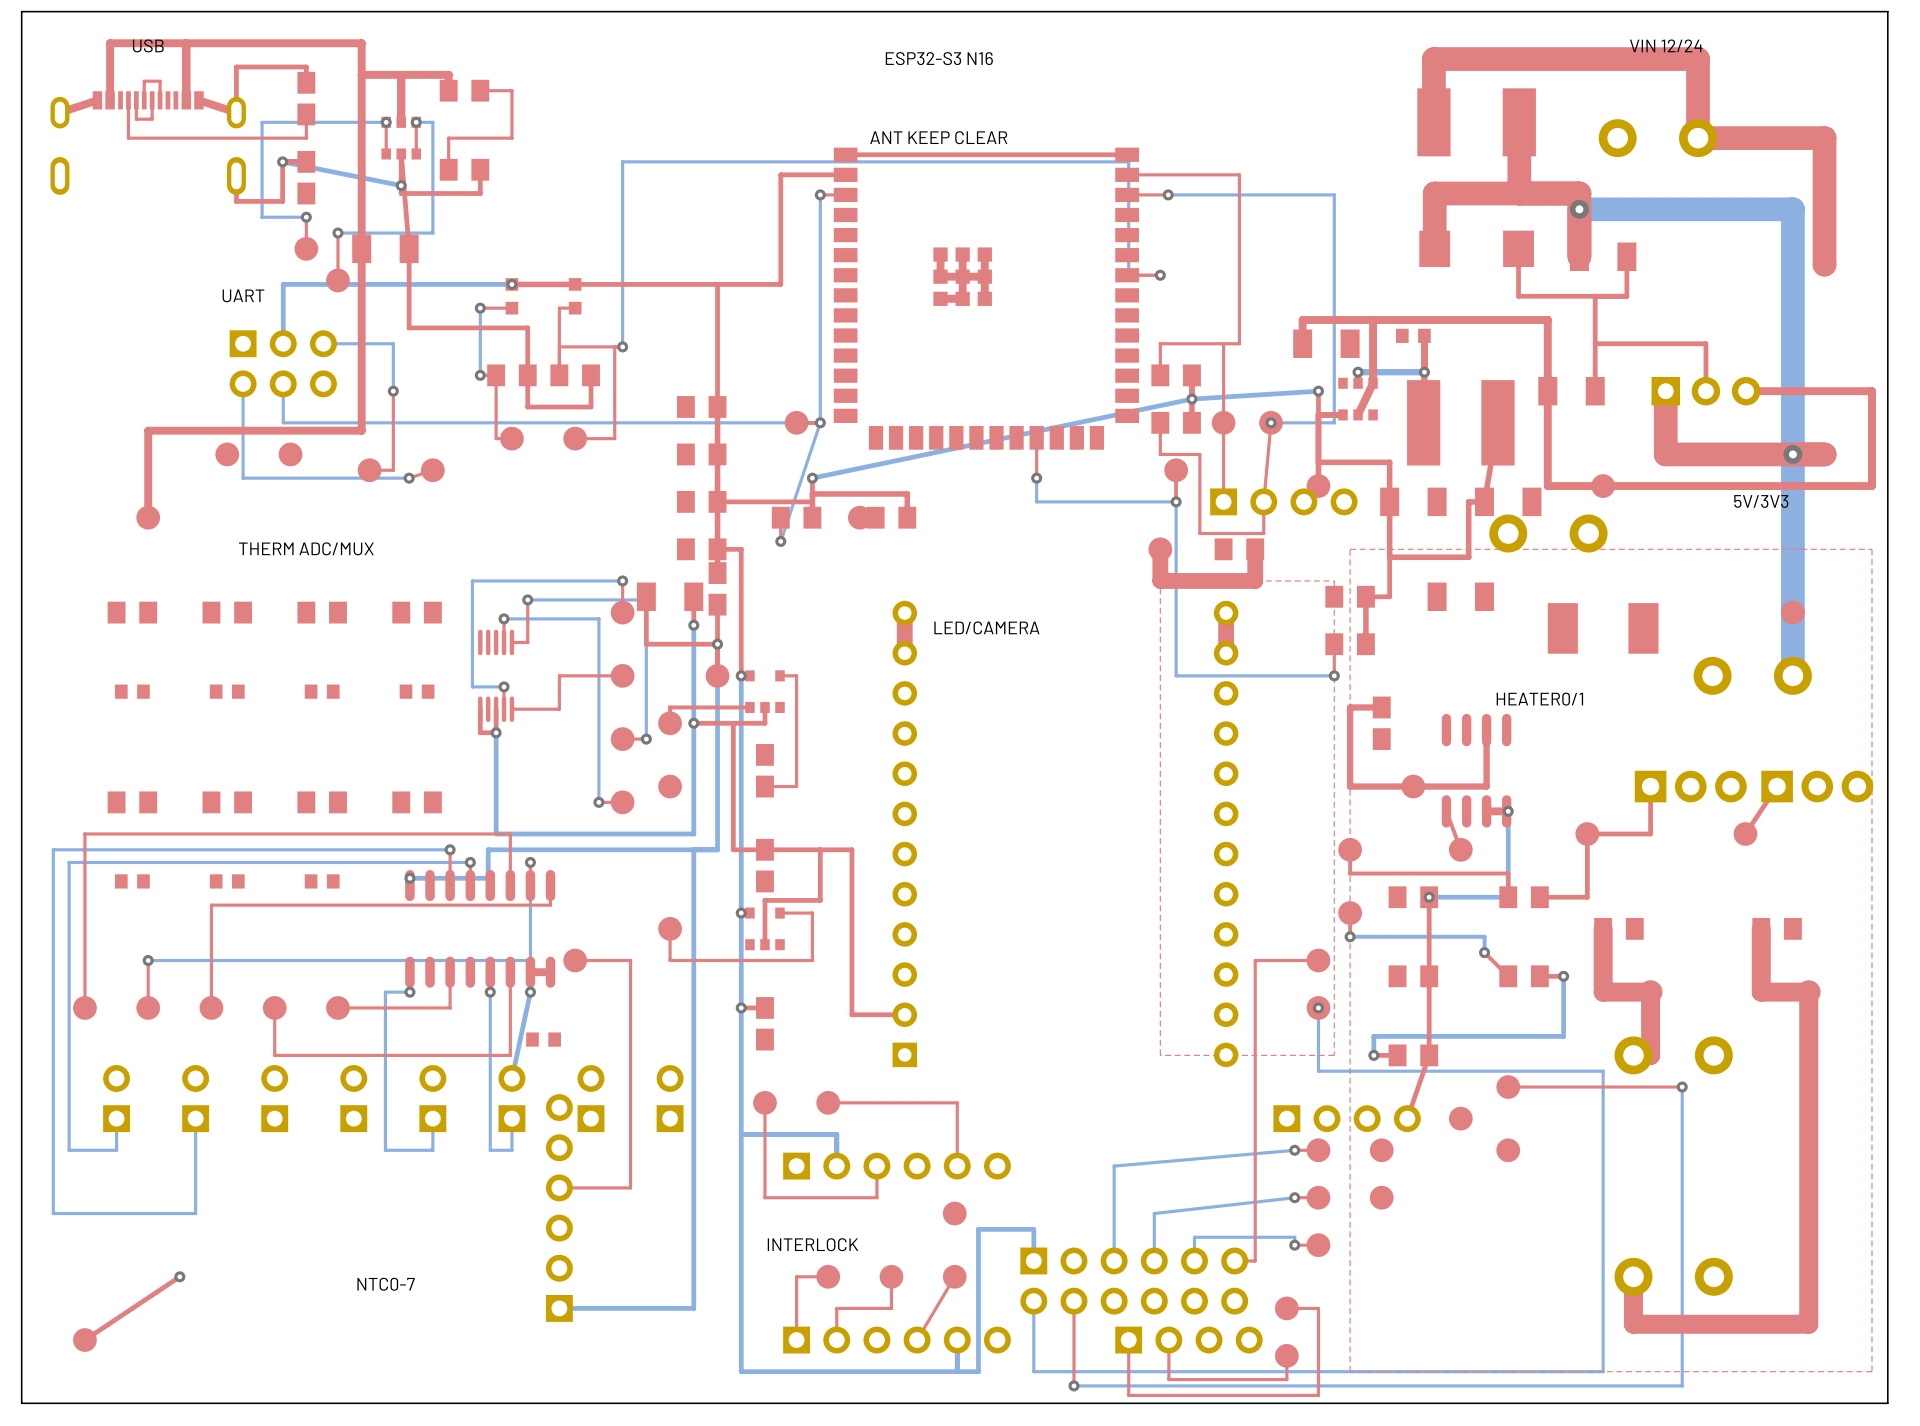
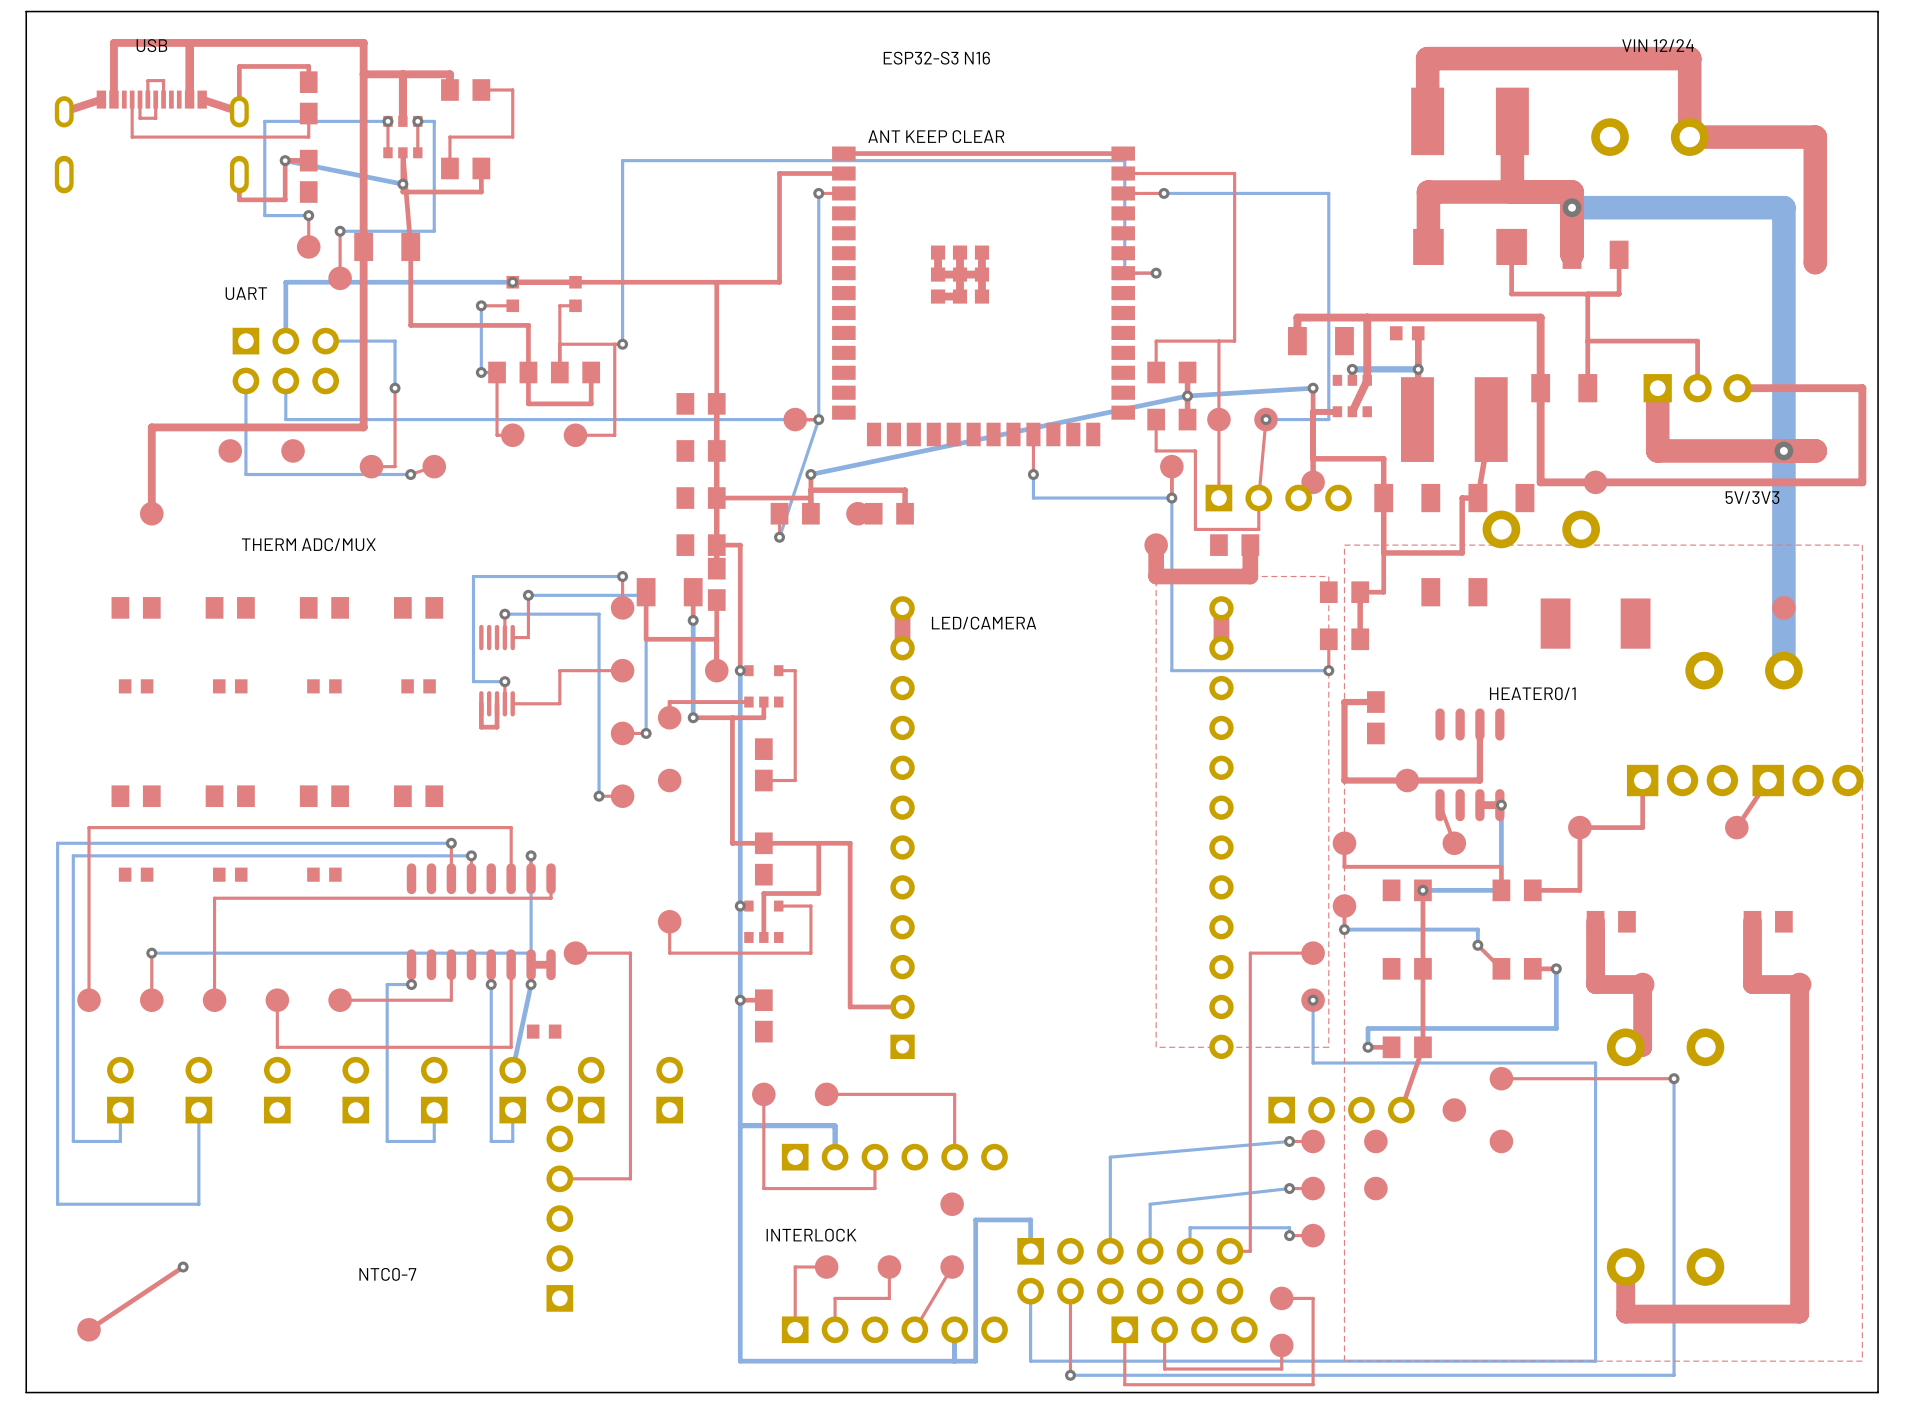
bottom track: (717, 644) (717, 849) (488, 849) (488, 878) (409, 878) -> none
via: (717, 644) -> none
bottom track: (693, 723) (693, 833) (496, 833) (496, 732) -> none
via: (496, 732) -> none
bottom track: (693, 849) (693, 1308) (559, 1308) -> none
via: (409, 878) -> none

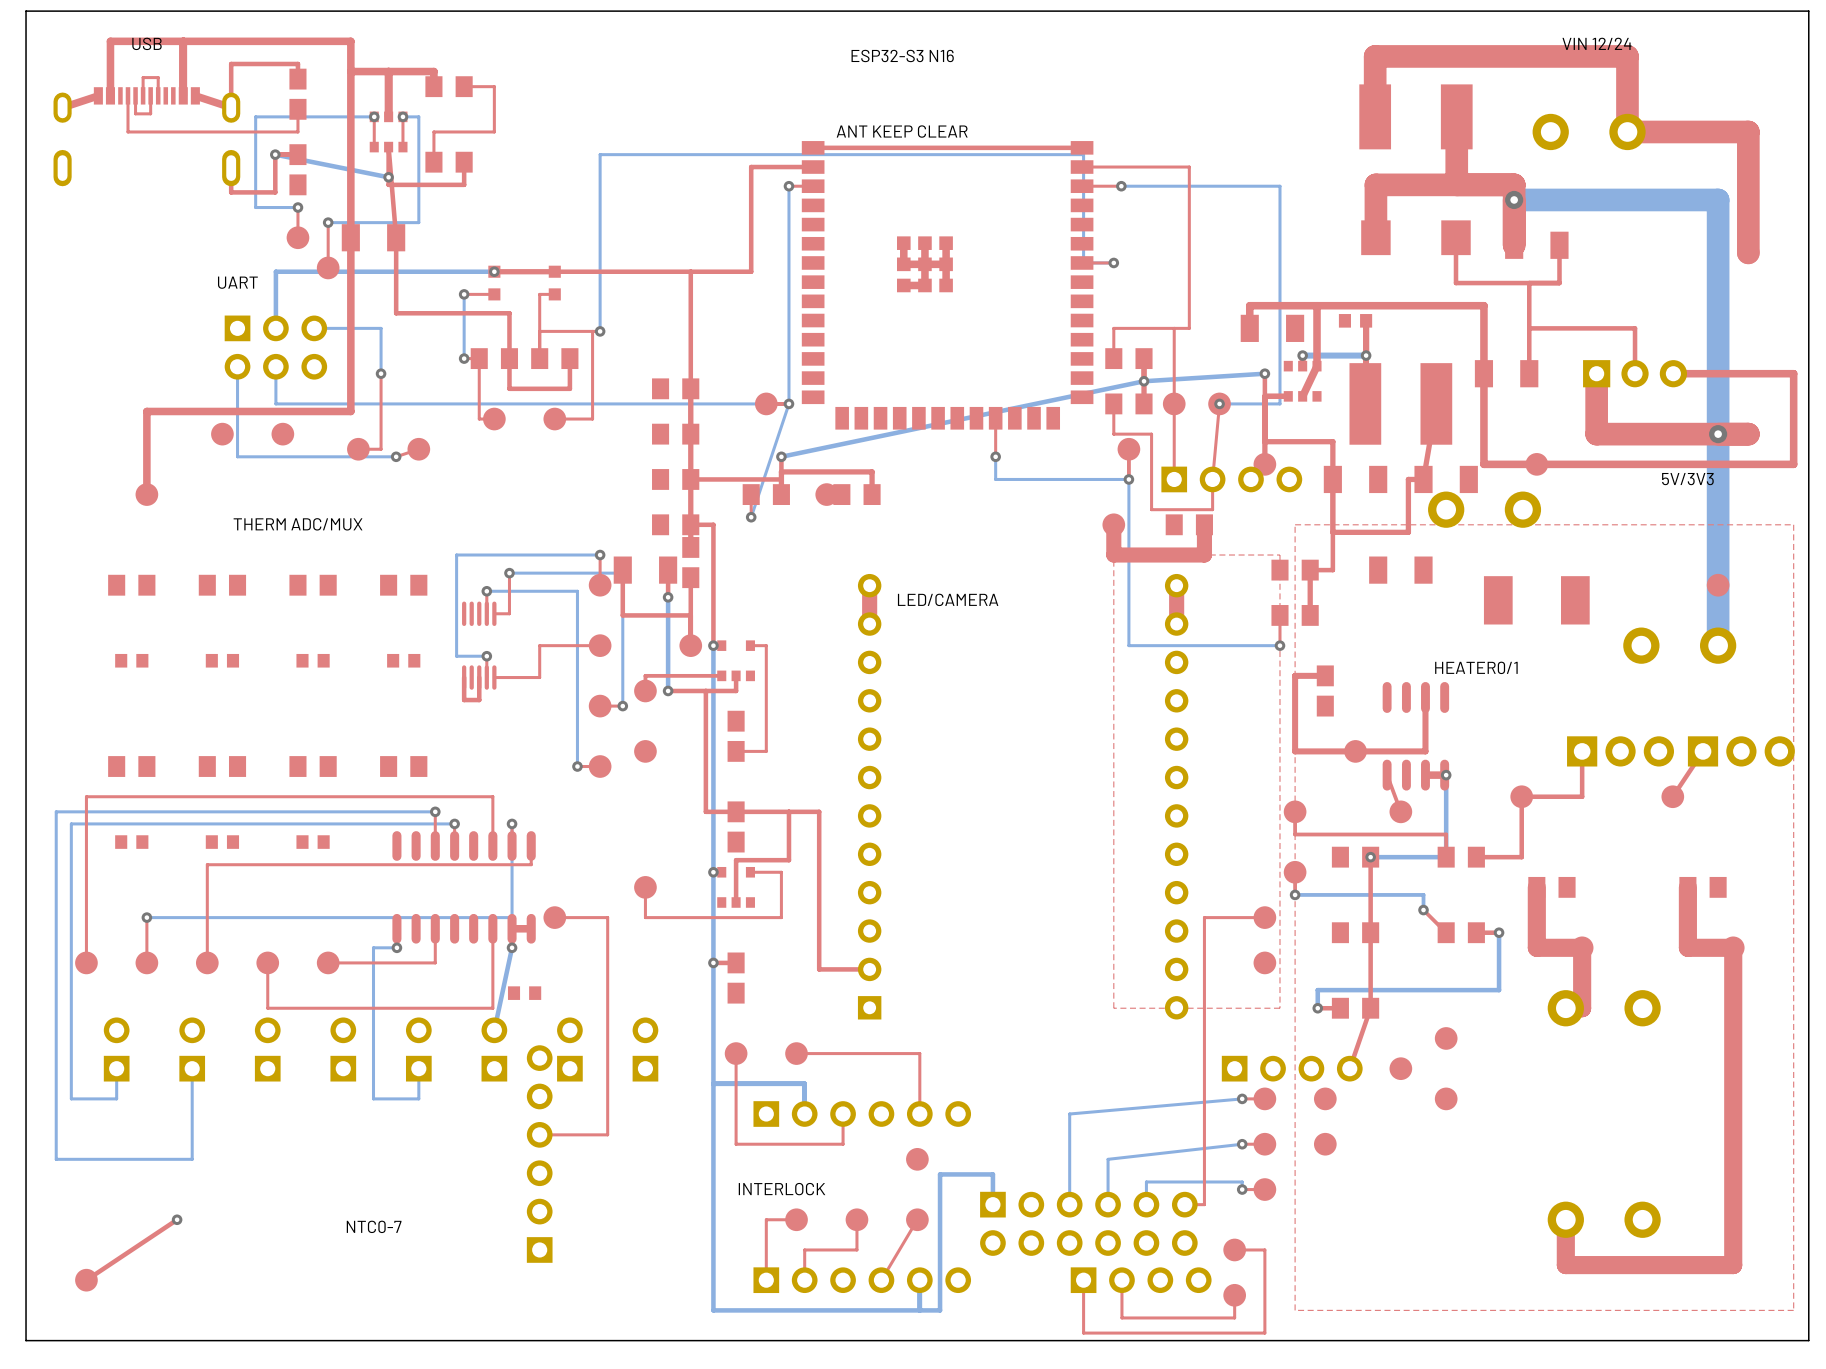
bottom track: (491, 984) (491, 1141) (512, 1141) (512, 1110) -> none
via: (491, 984) -> none
bottom track: (1313, 1000) (1313, 1063) (1595, 1063) (1595, 1361) (1030, 1361) (1030, 1291) -> none
via: (1313, 1000) -> none
top track: (1501, 1078) (1674, 1078) -> none
bottom track: (1674, 1078) (1674, 1375) (1070, 1375) -> none
via: (1674, 1078) -> none
top track: (1070, 1291) (1070, 1375) -> none
via: (1070, 1375) -> none

